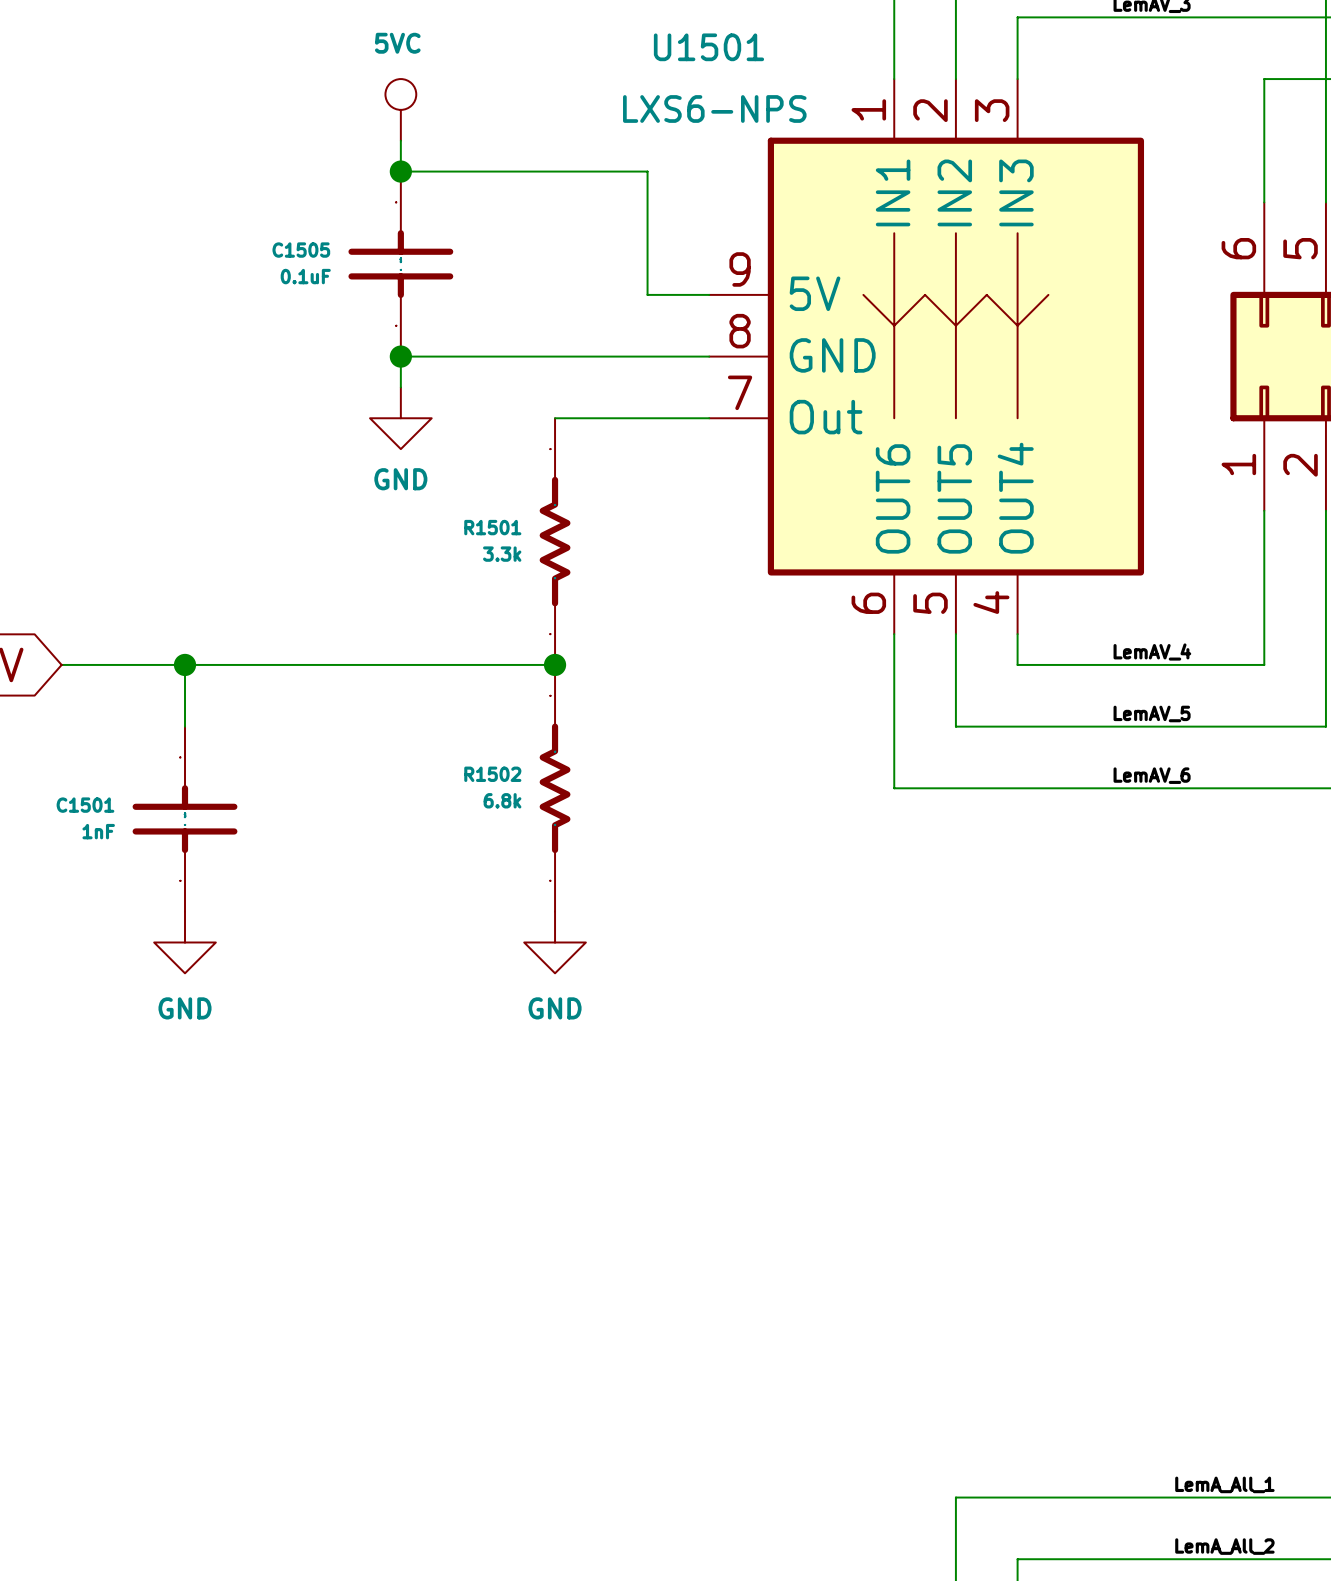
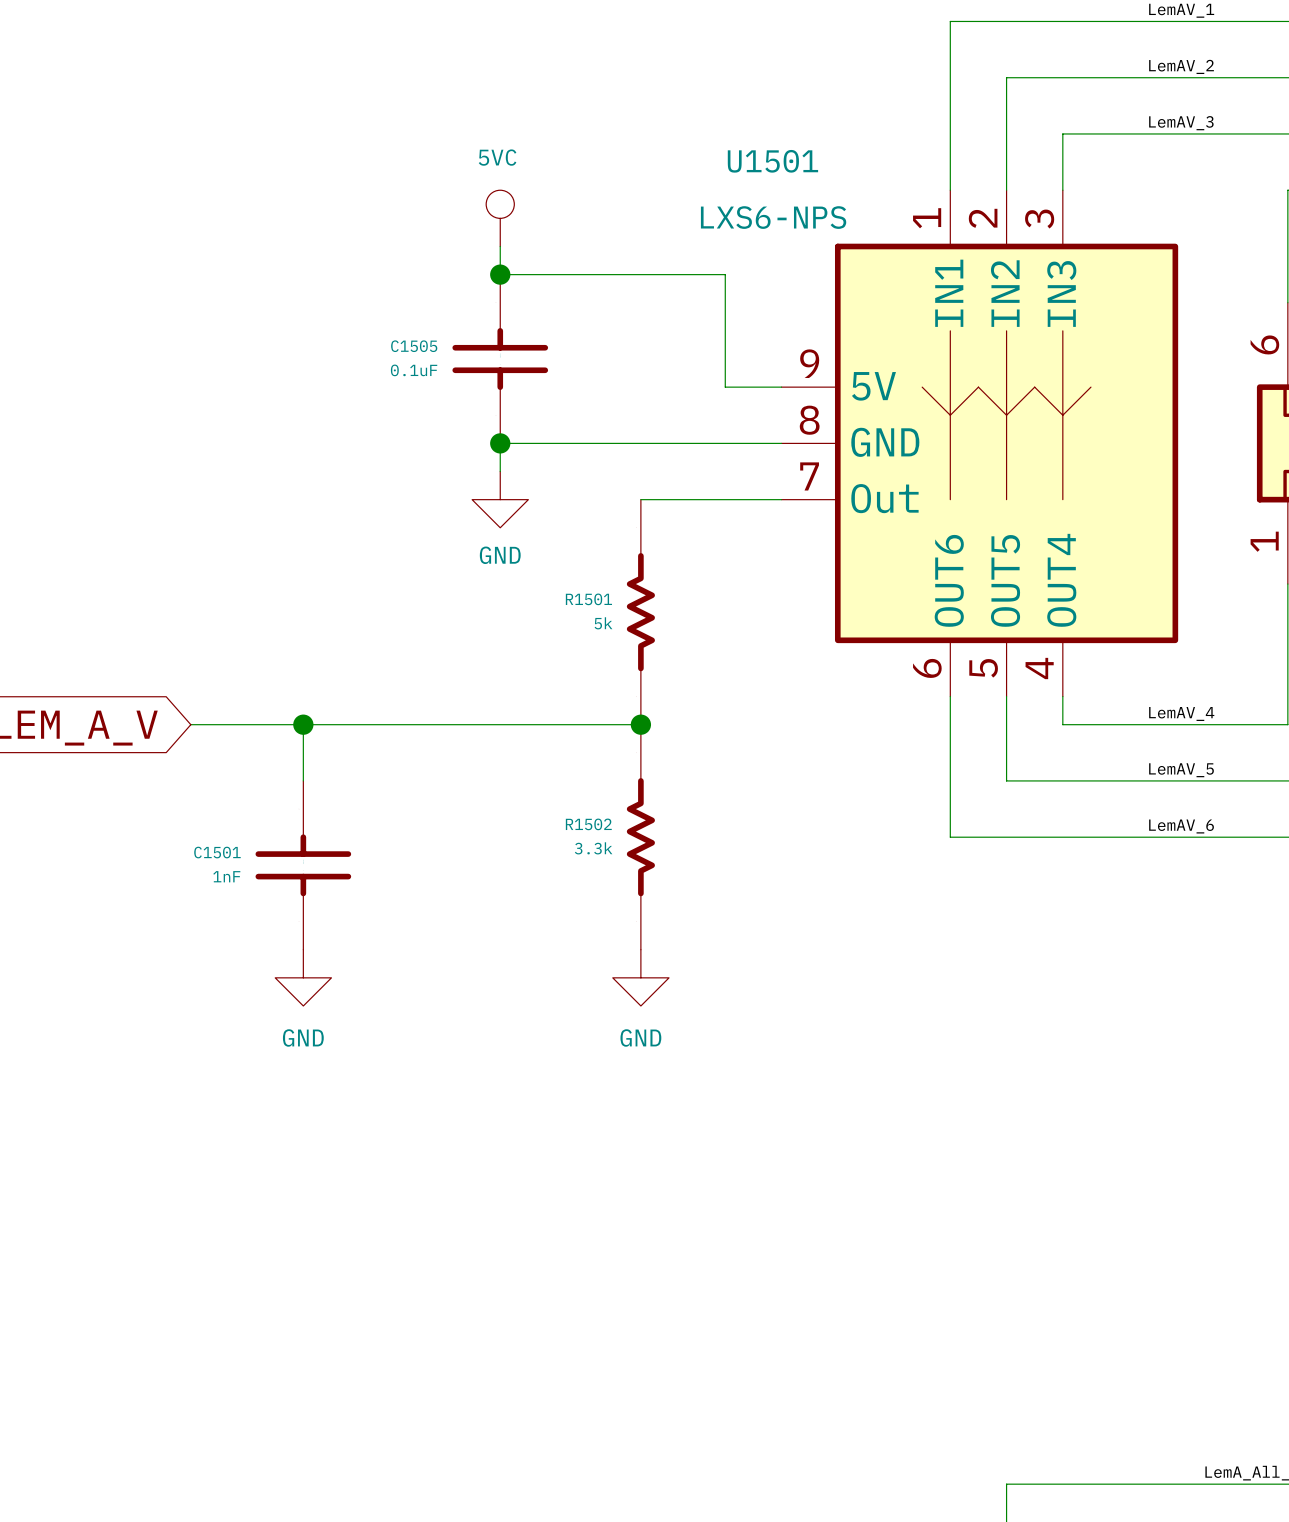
R1501 value: 3.3k (502, 554) -> 5k (603, 623)
R1502 value: 6.8k (502, 800) -> 3.3k (593, 848)

